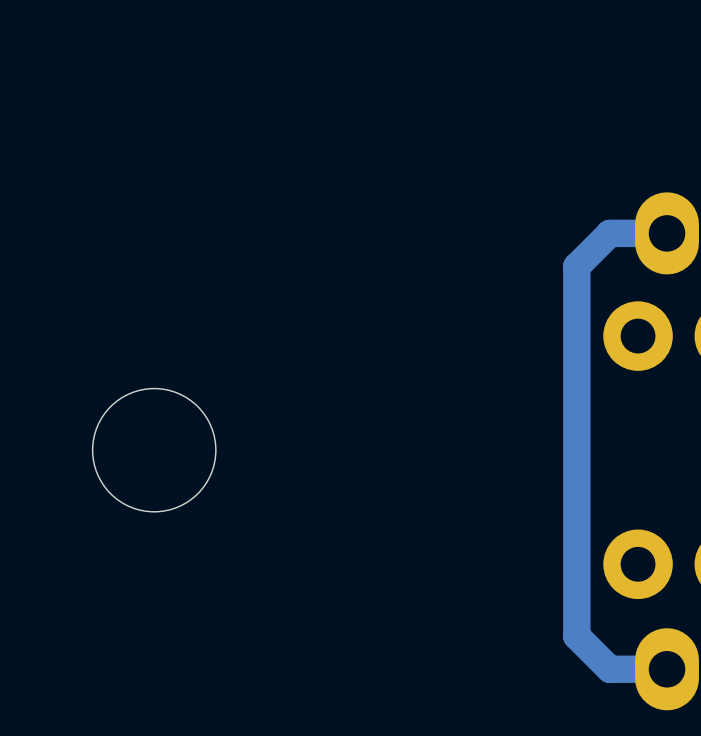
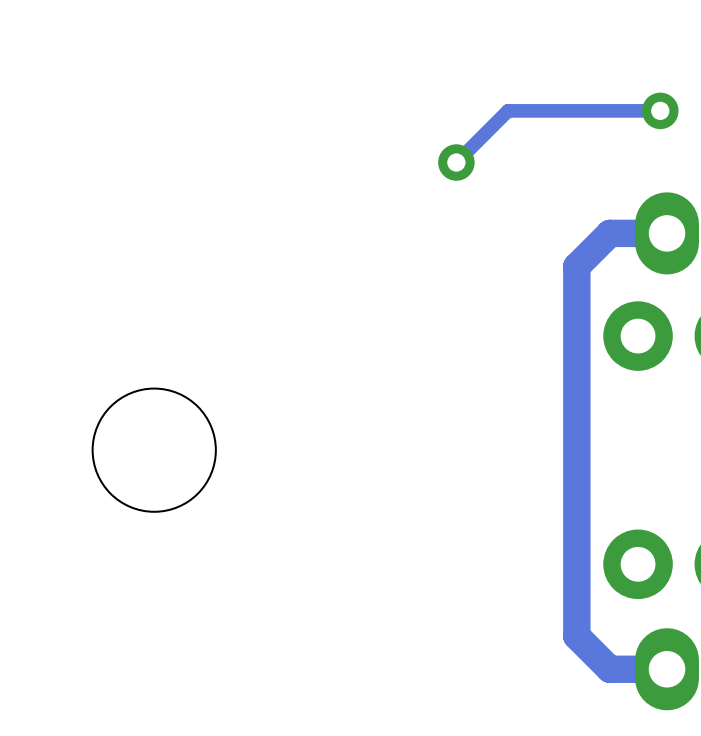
track: none -> (660, 110) (508, 110) (456, 162)
via: none -> (660, 110)
via: none -> (456, 162)

